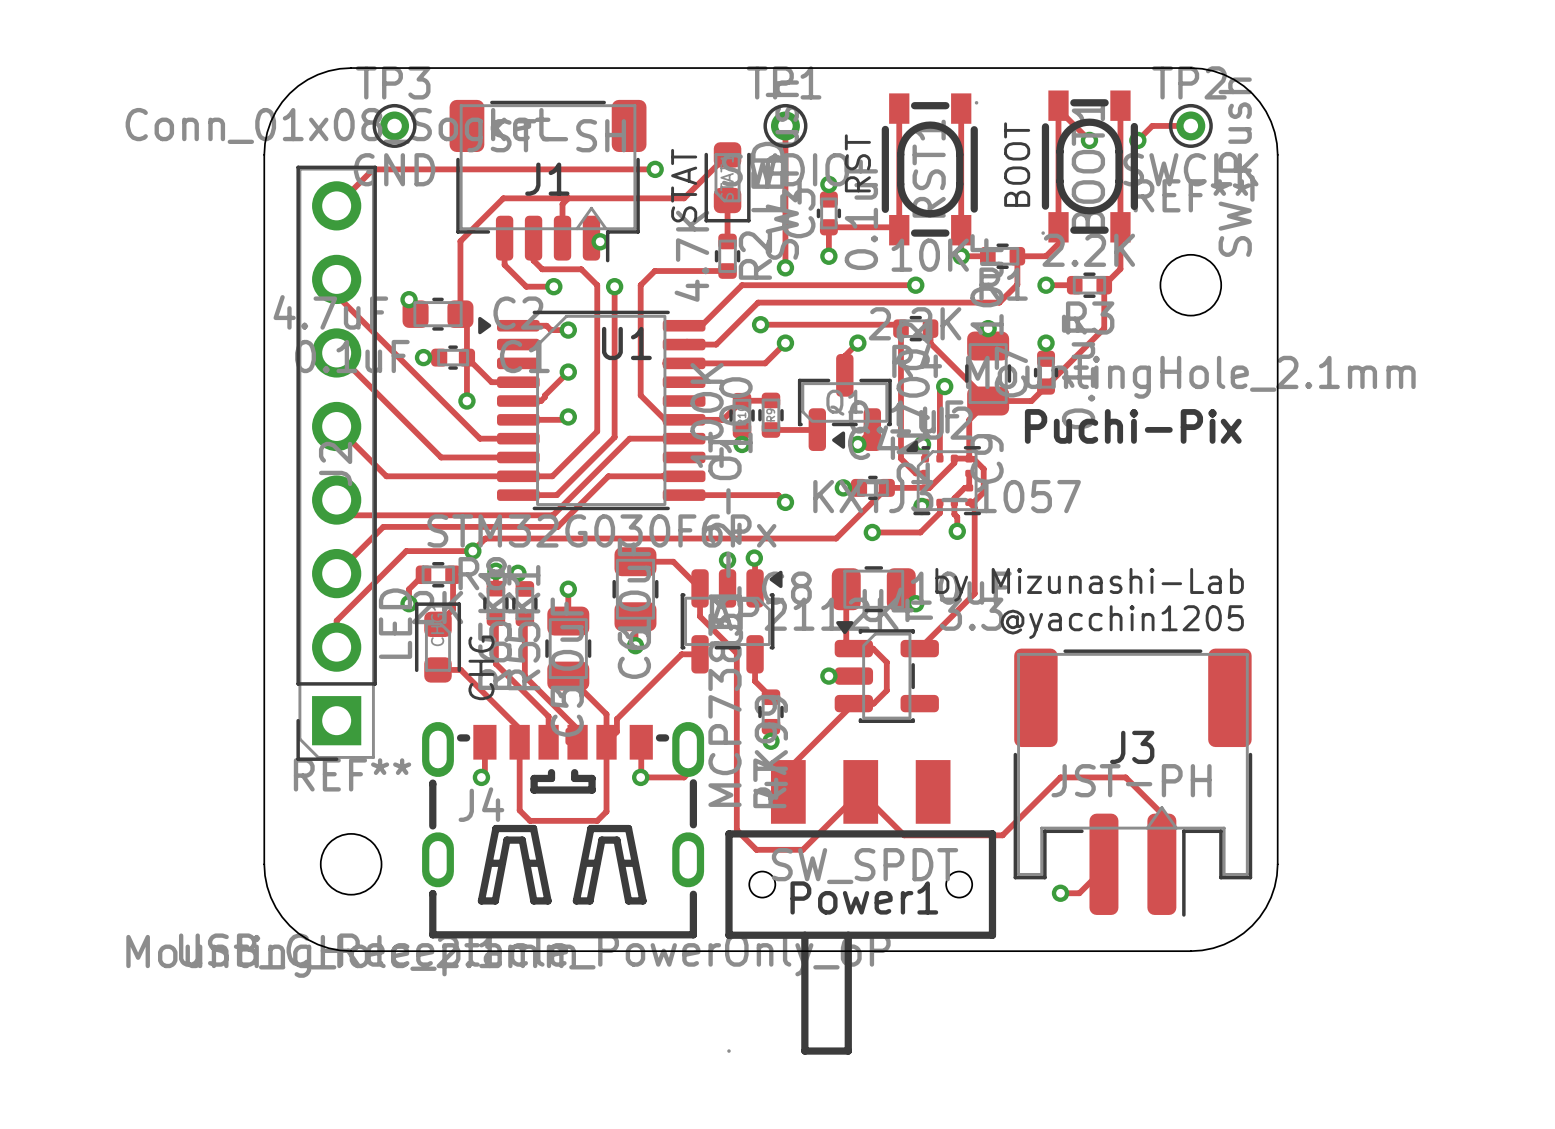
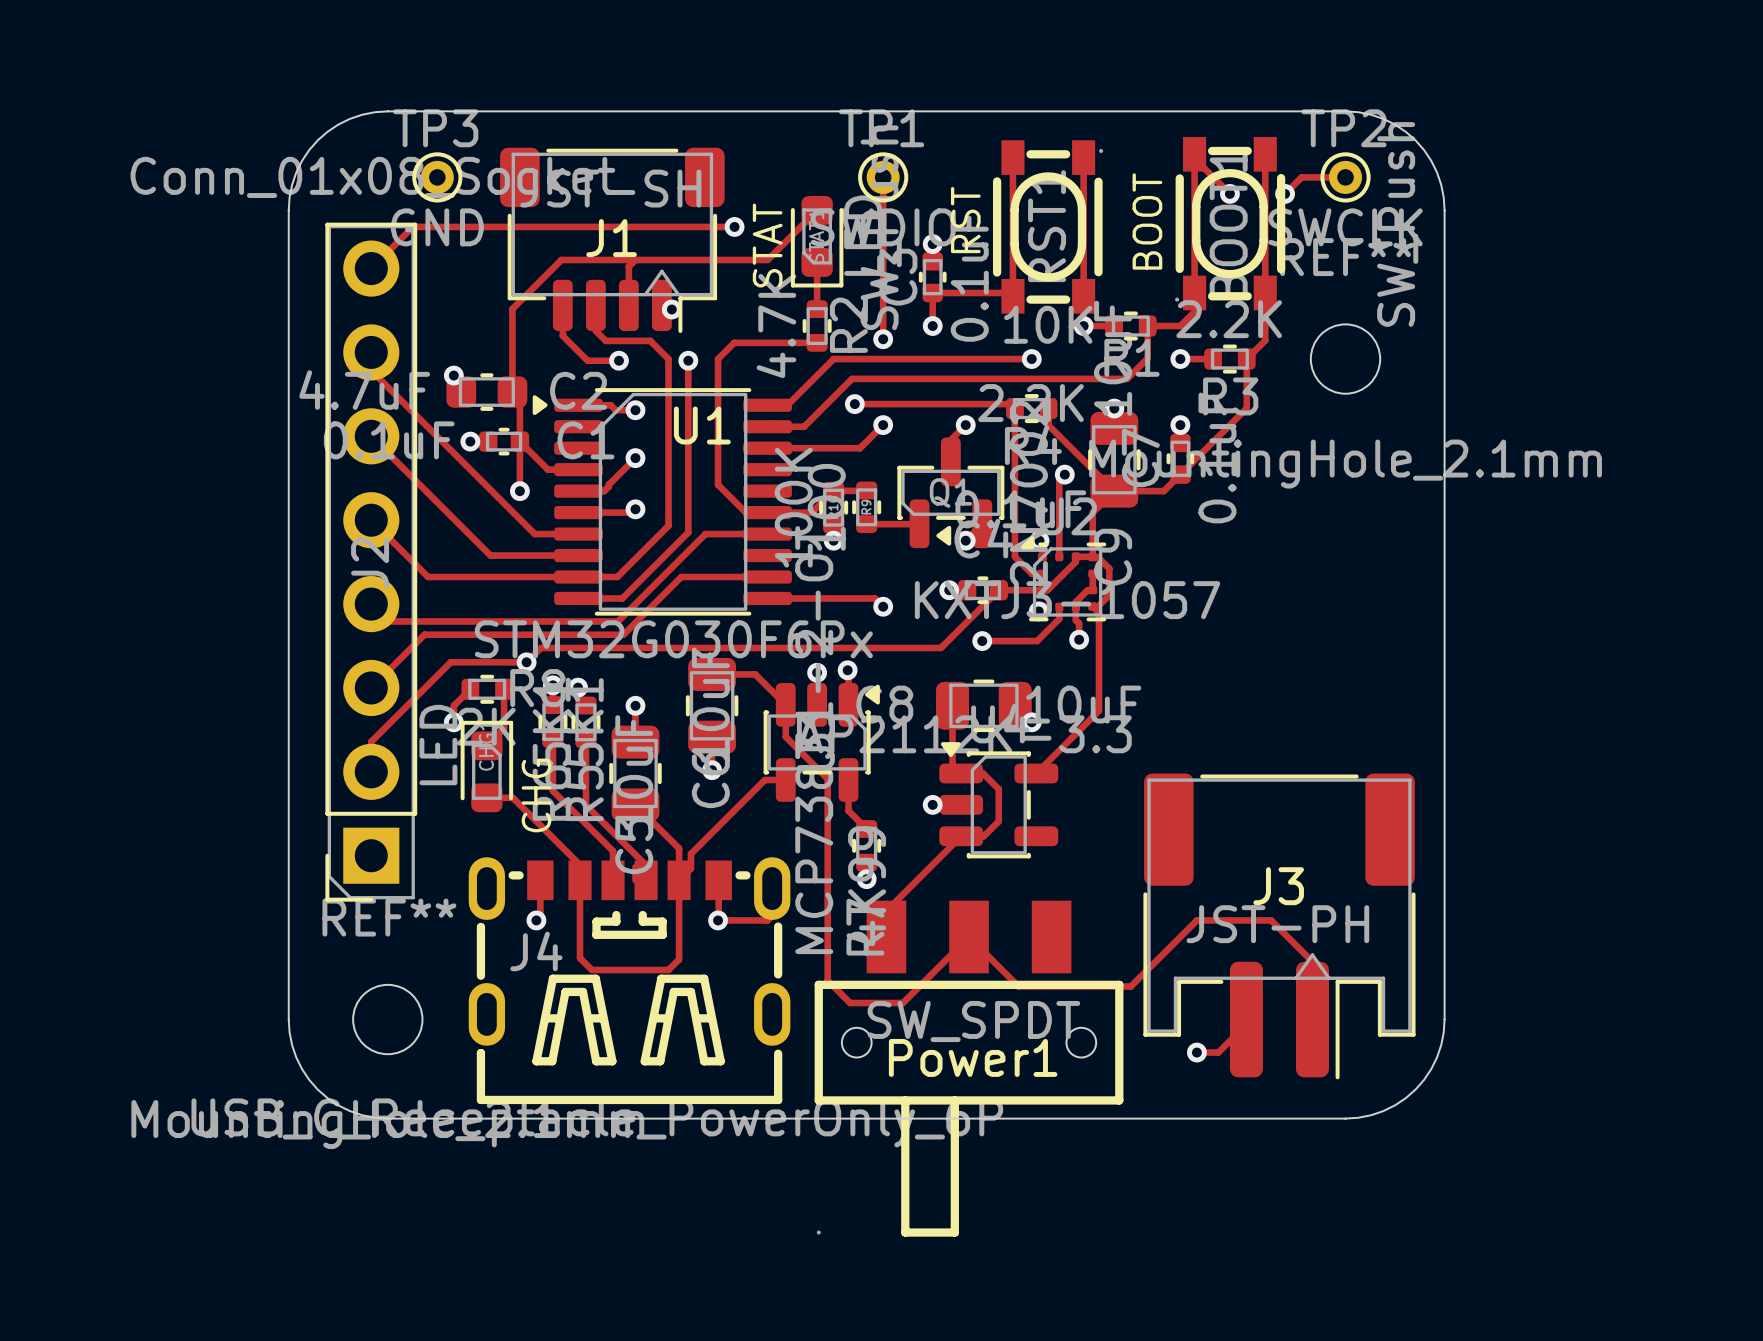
text: Puchi-Pix (1133, 426) -> none
text: by Mizunashi-Lab (1089, 584) -> none
text: @yacchin1205 (1122, 622) -> none

